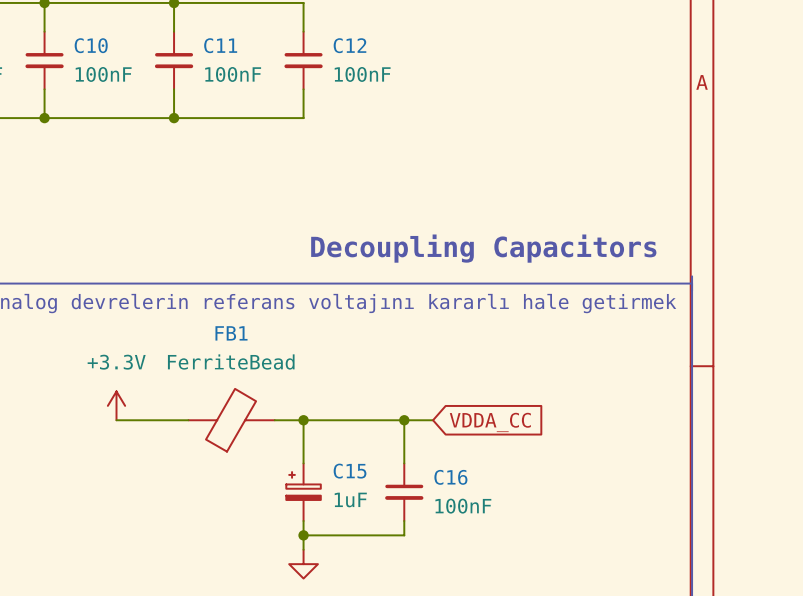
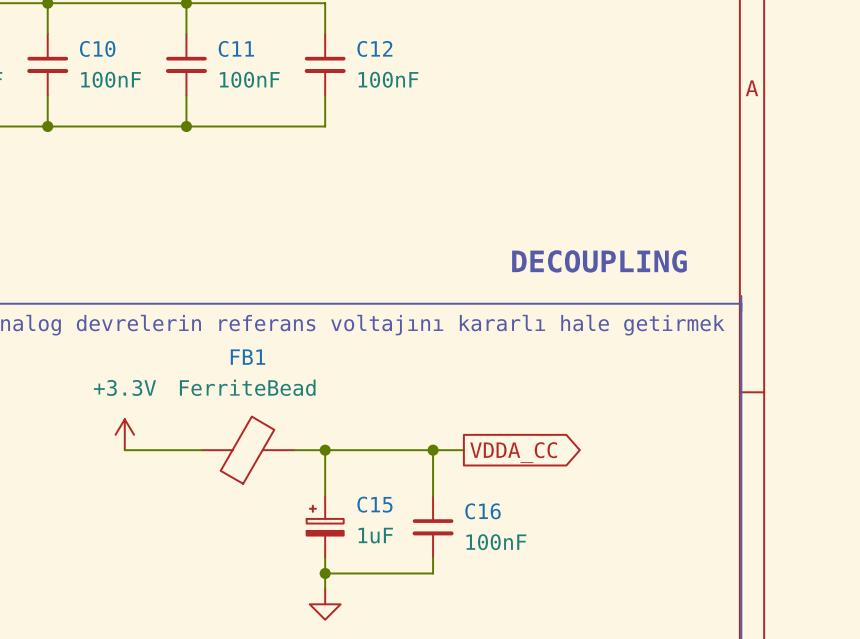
text: none -> DECOUPLING (599, 261)
text: Decoupling Capacitors (483, 248) -> none
global label shape: input (490, 422) -> output (513, 452)

